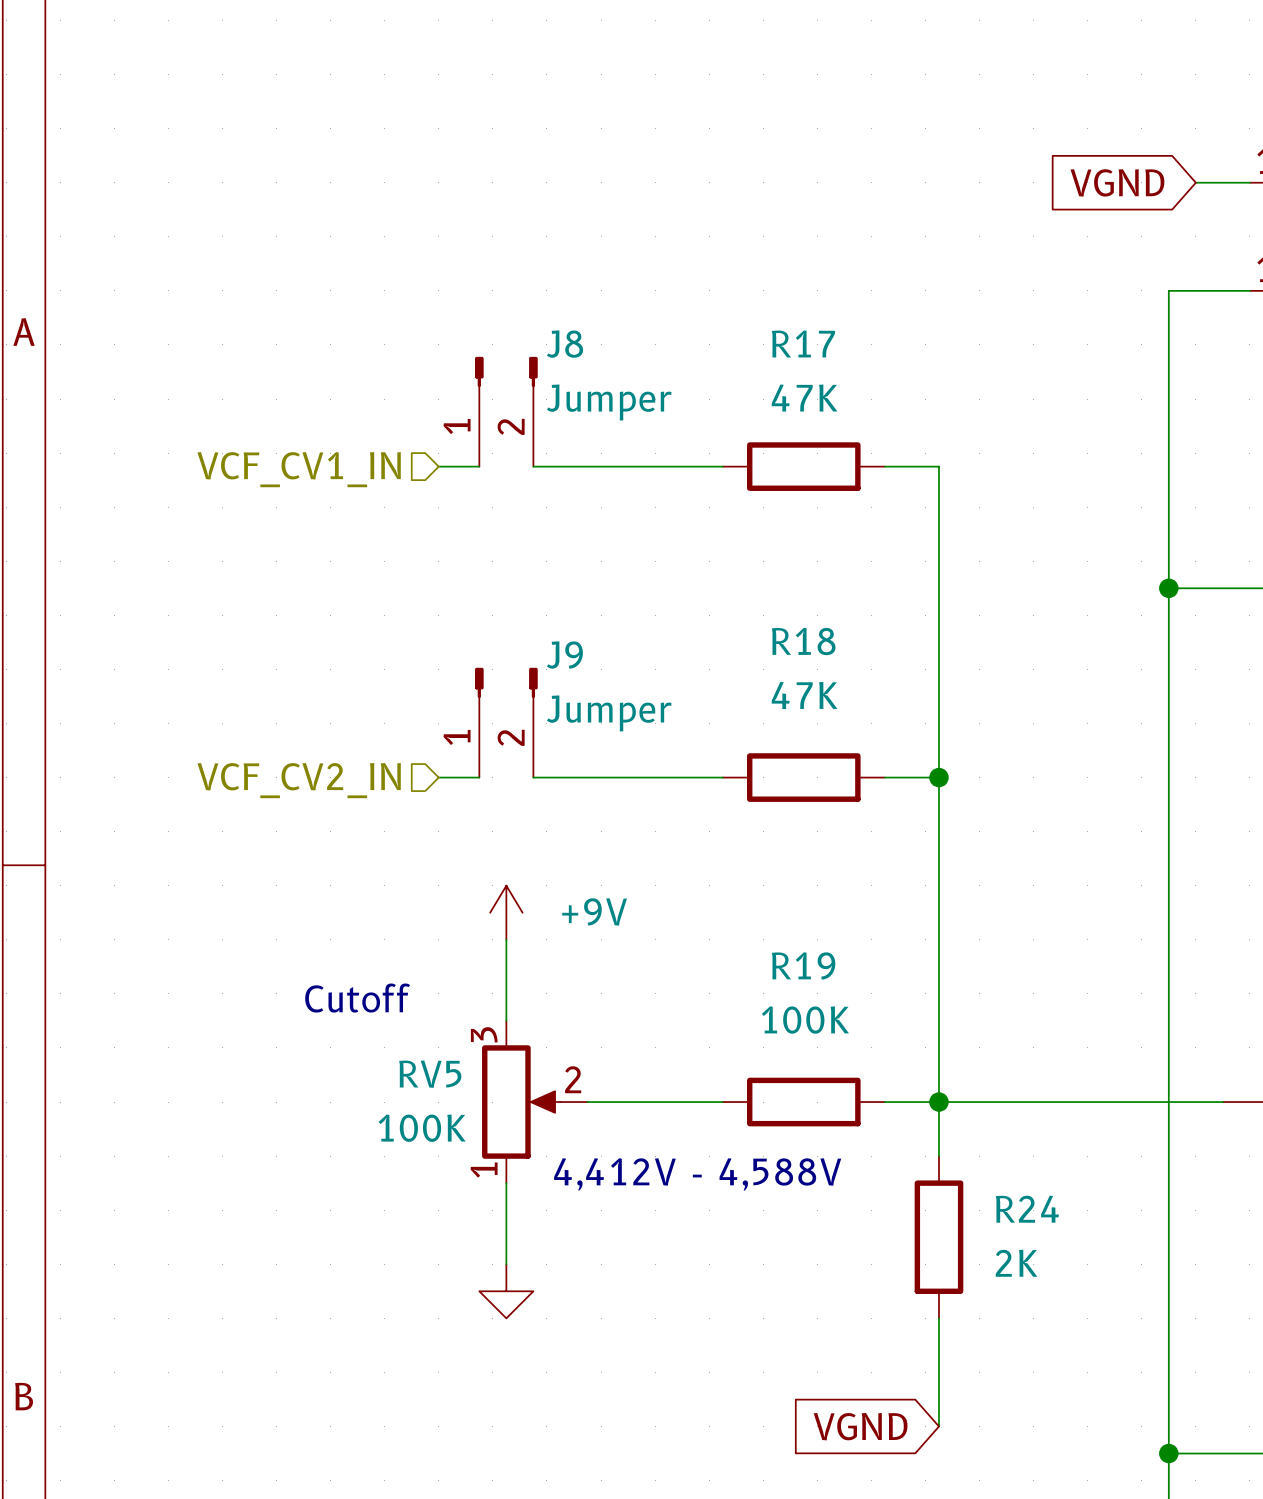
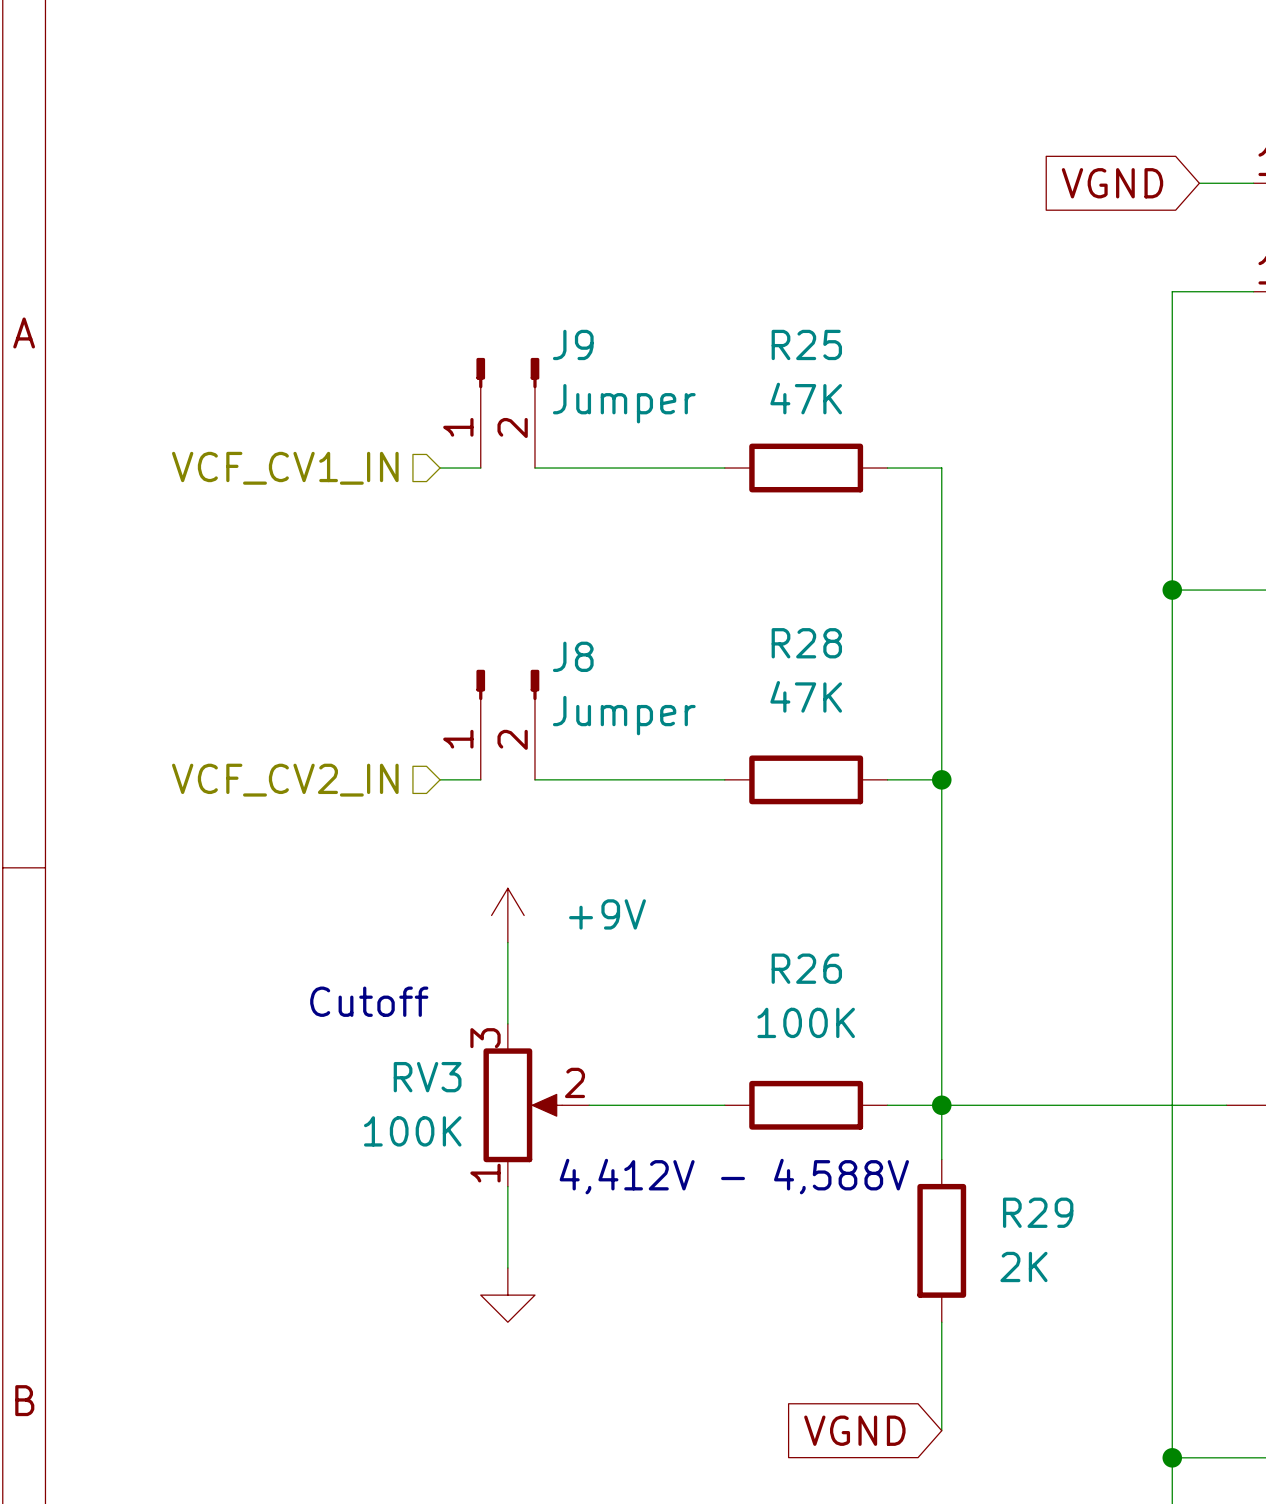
R17 name: R17 (803, 343) -> R25 (806, 344)
J8 name: J8 (565, 344) -> J9 (573, 344)
R18 name: R18 (803, 641) -> R28 (806, 643)
J9 name: J9 (564, 655) -> J8 (573, 656)
R19 name: R19 (803, 965) -> R26 (806, 968)
RV5 name: RV5 (430, 1074) -> RV3 (427, 1077)
R24 name: R24 (1027, 1209) -> R29 (1038, 1212)

